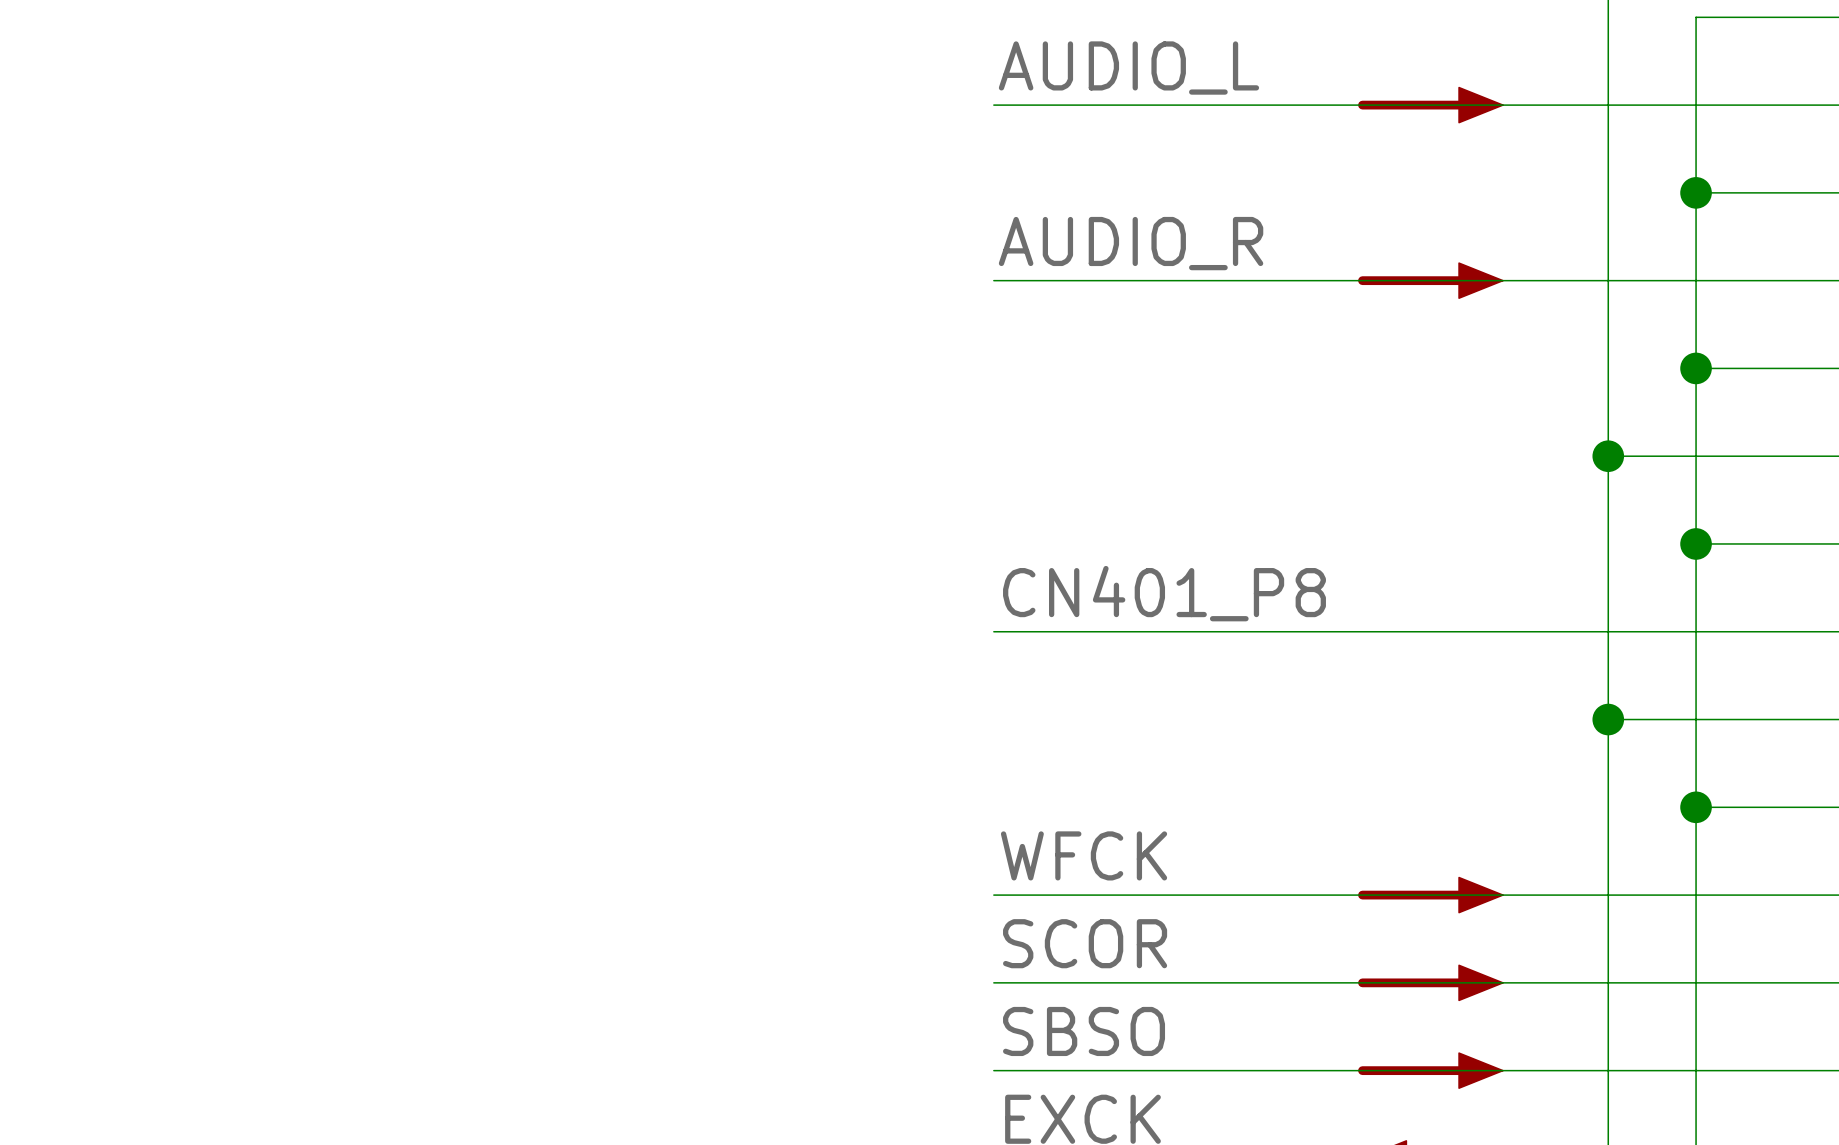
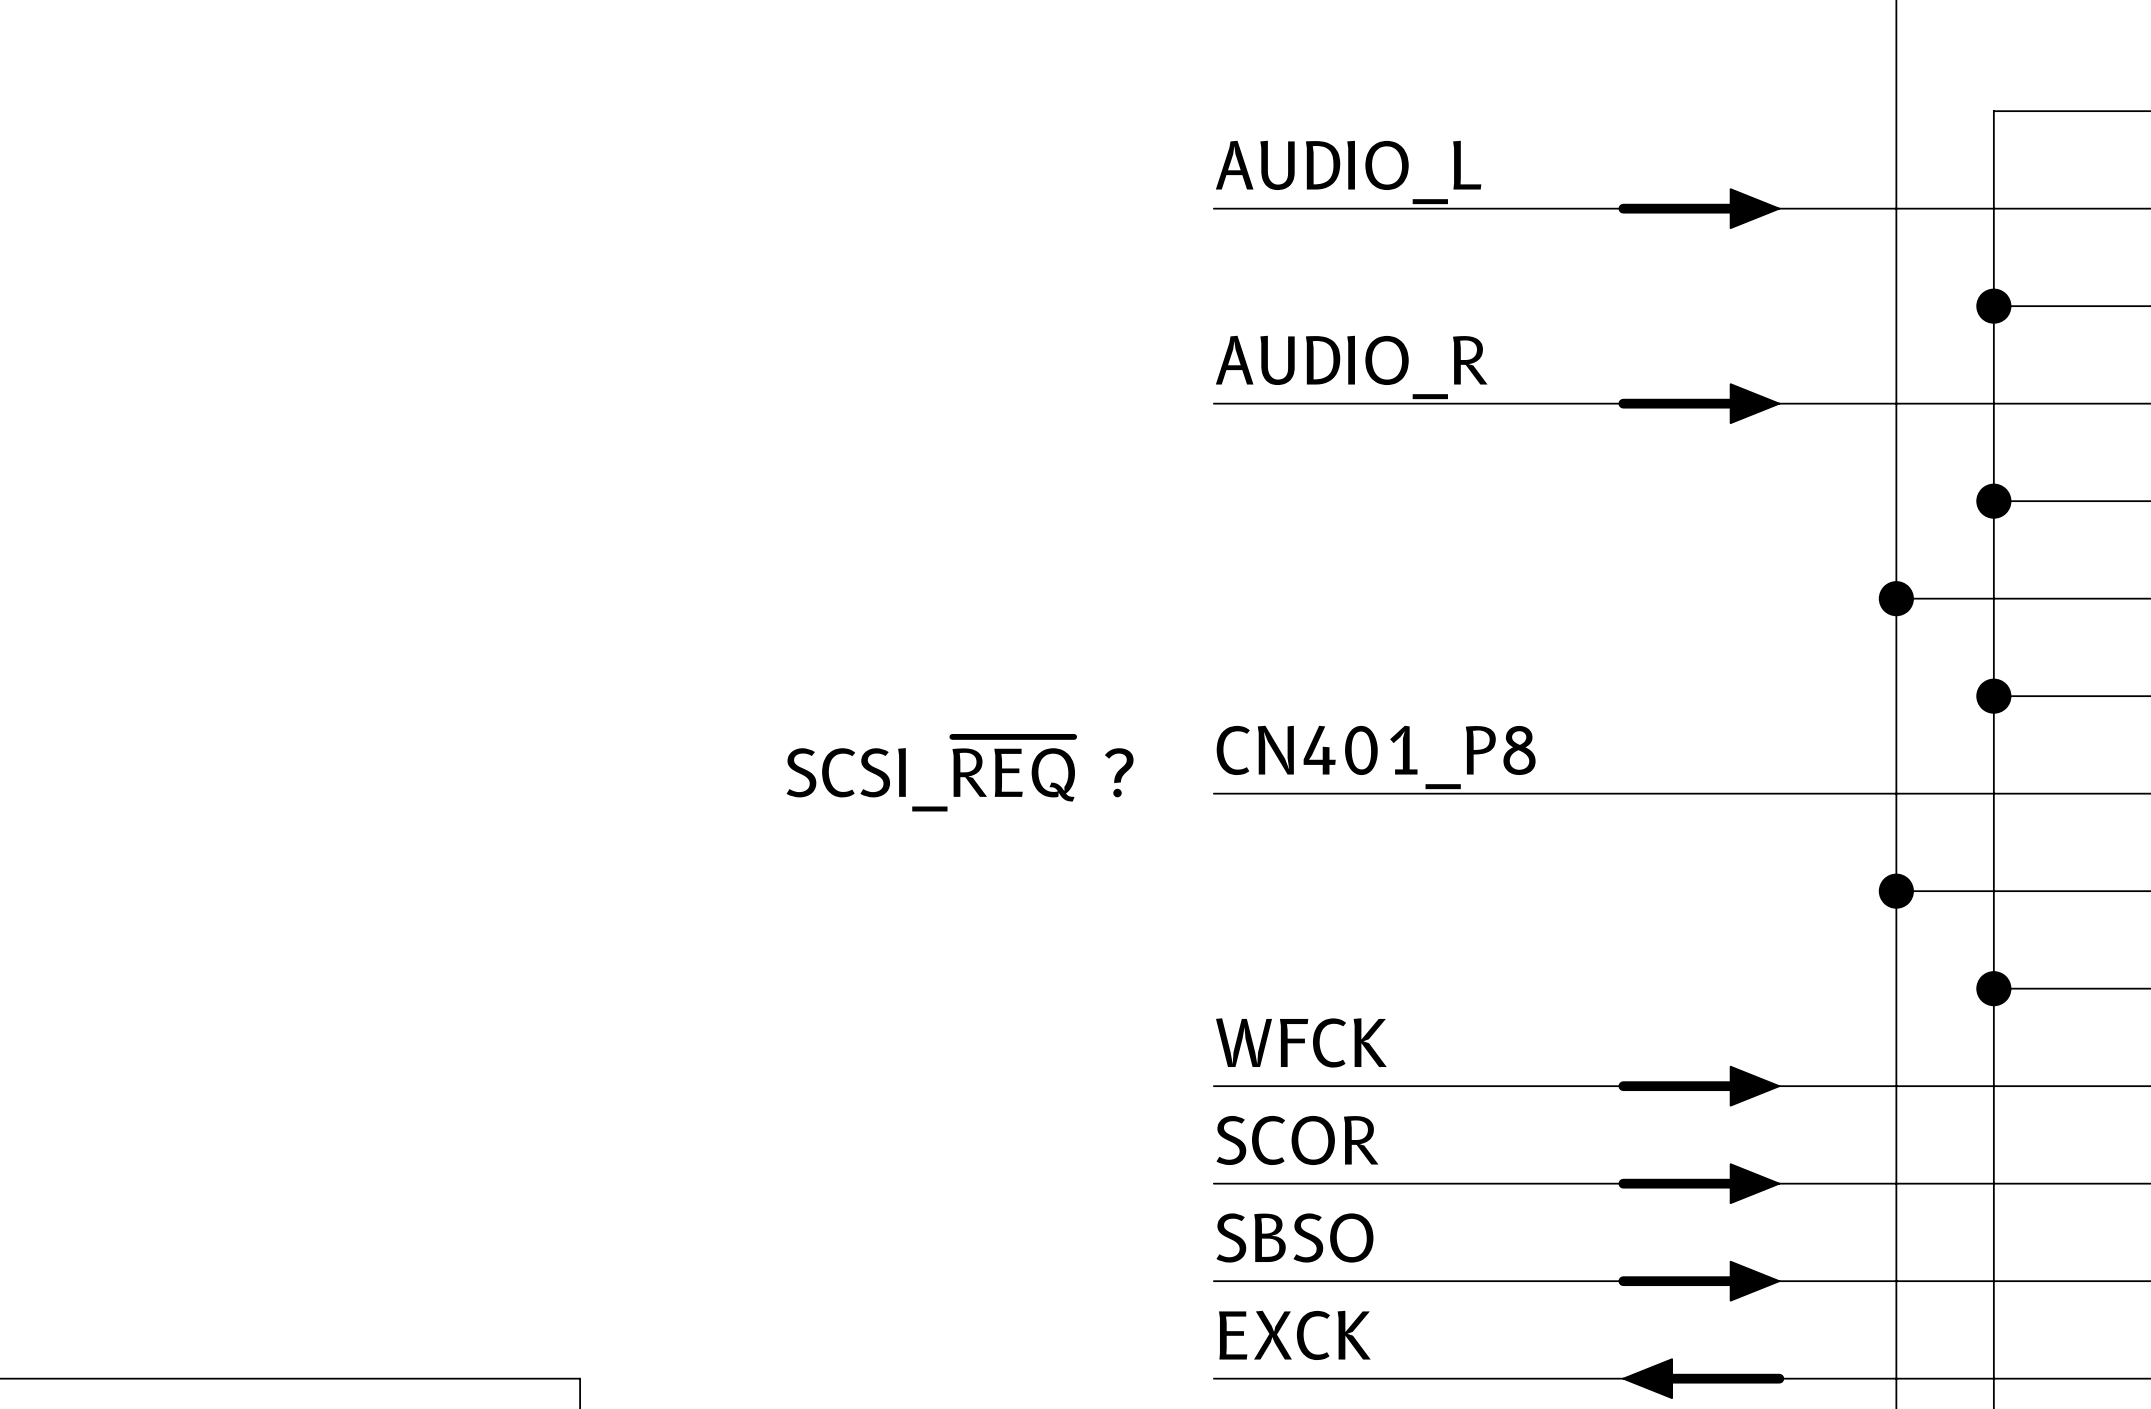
text: none -> SCSI_~{REQ} ? (960, 774)

